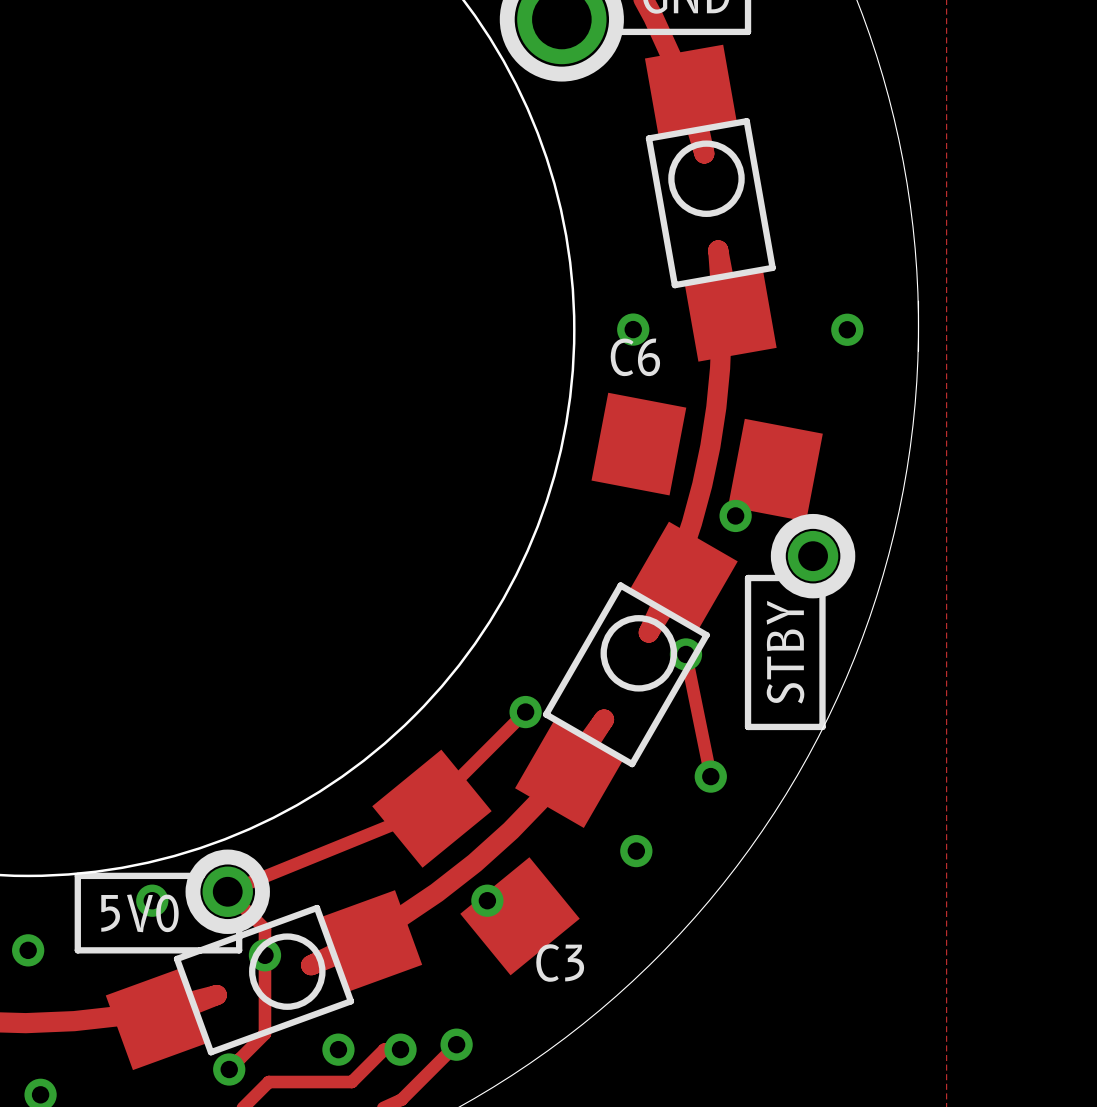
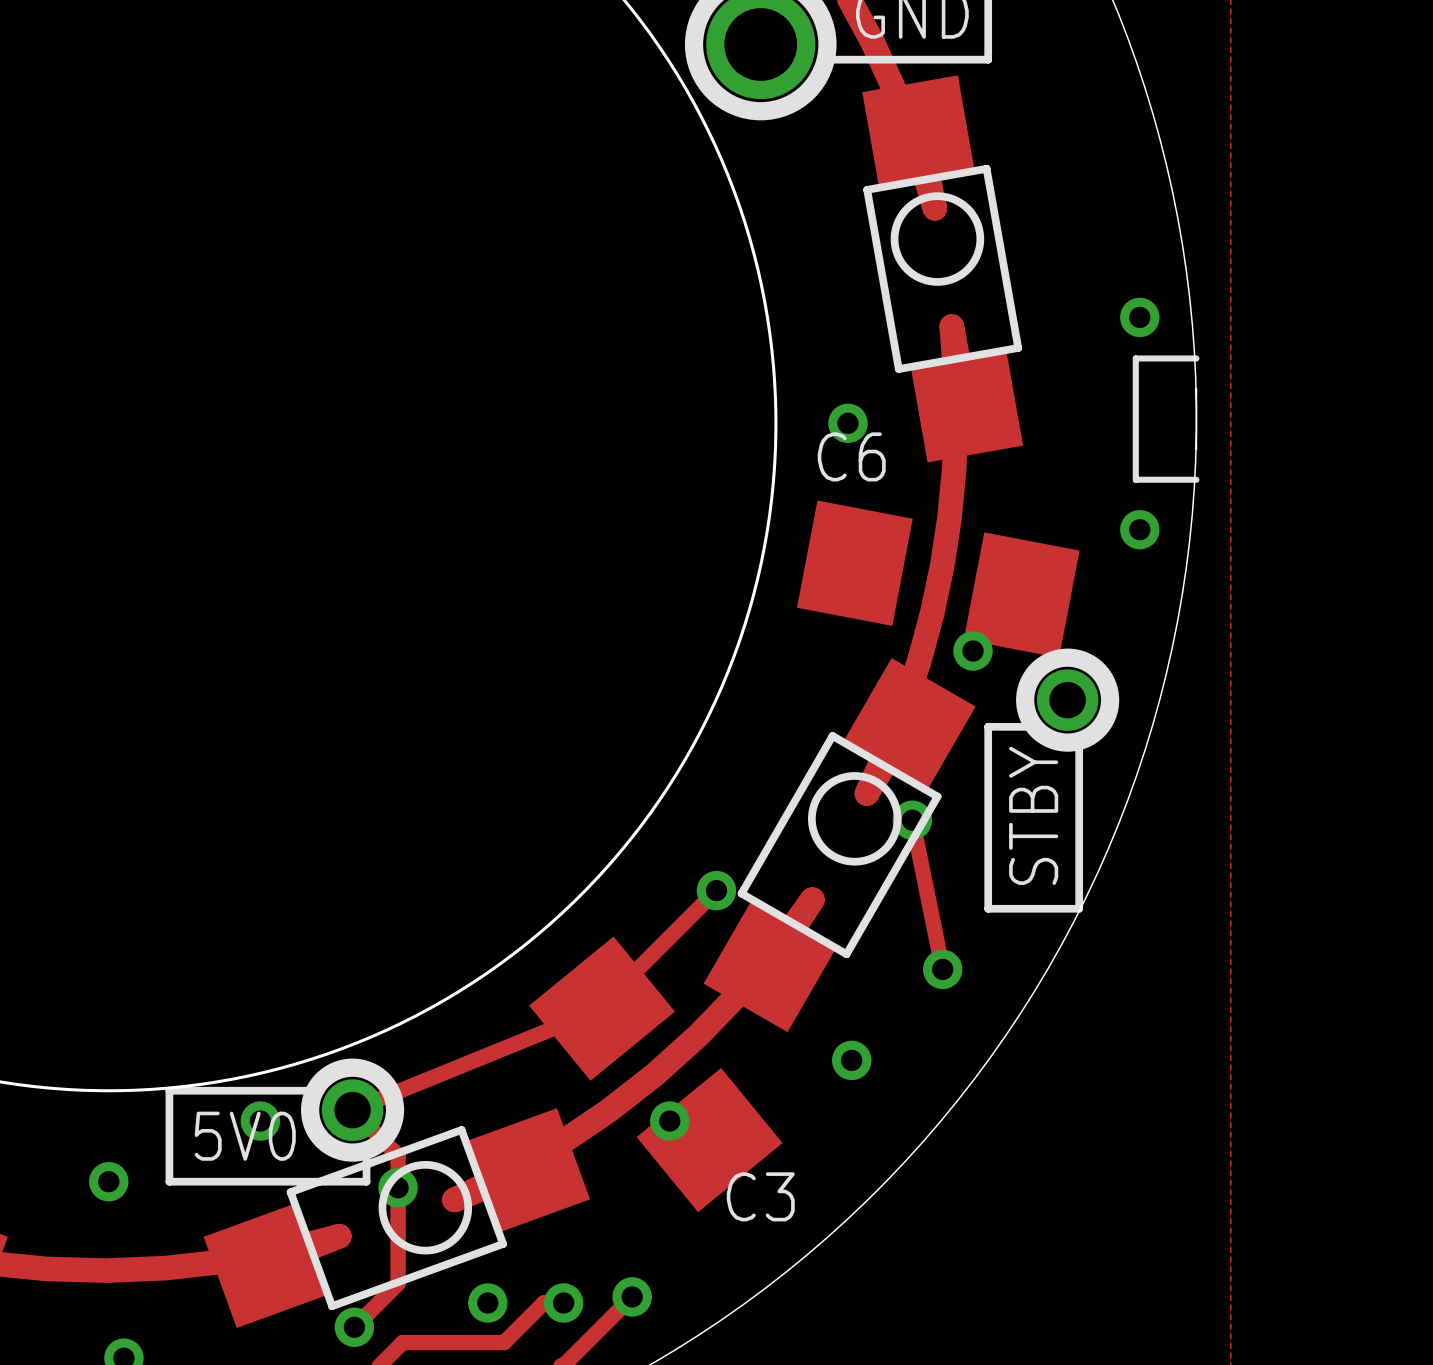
via: none -> (1139, 317)
line: none -> (1196, 358) (1135, 358) (1135, 479) (1196, 479)
via: (847, 329) -> none
via: none -> (1139, 529)

